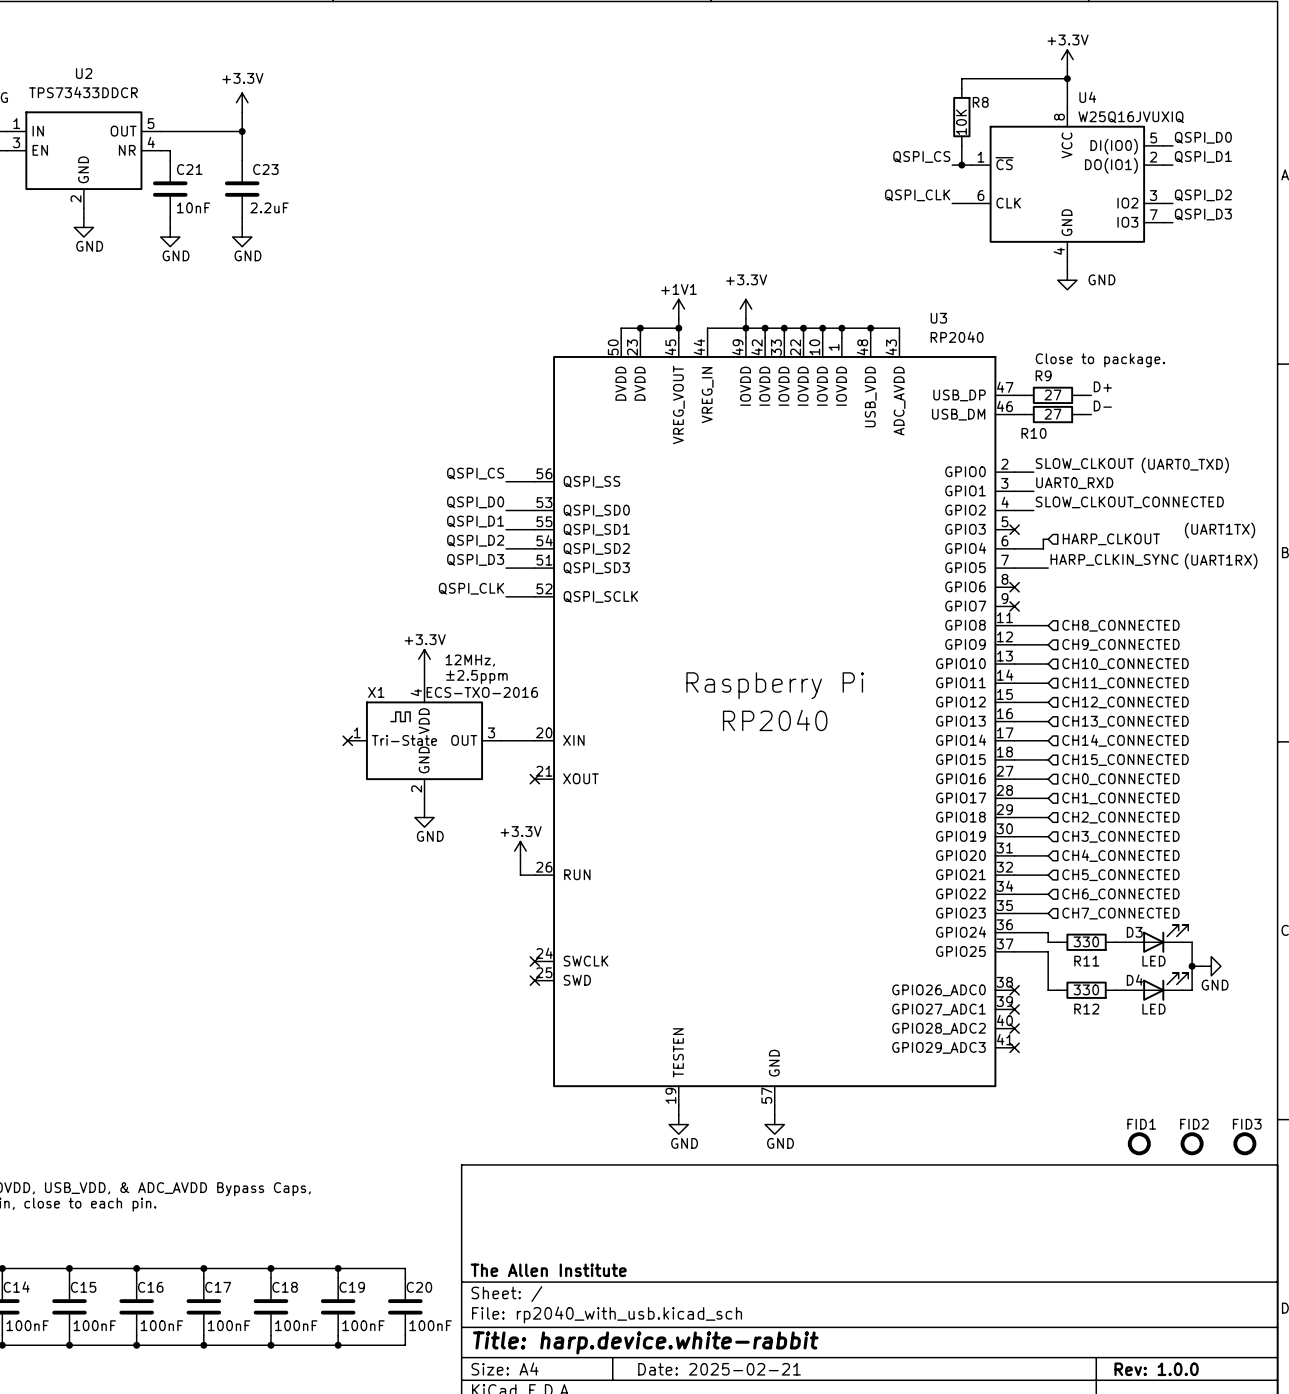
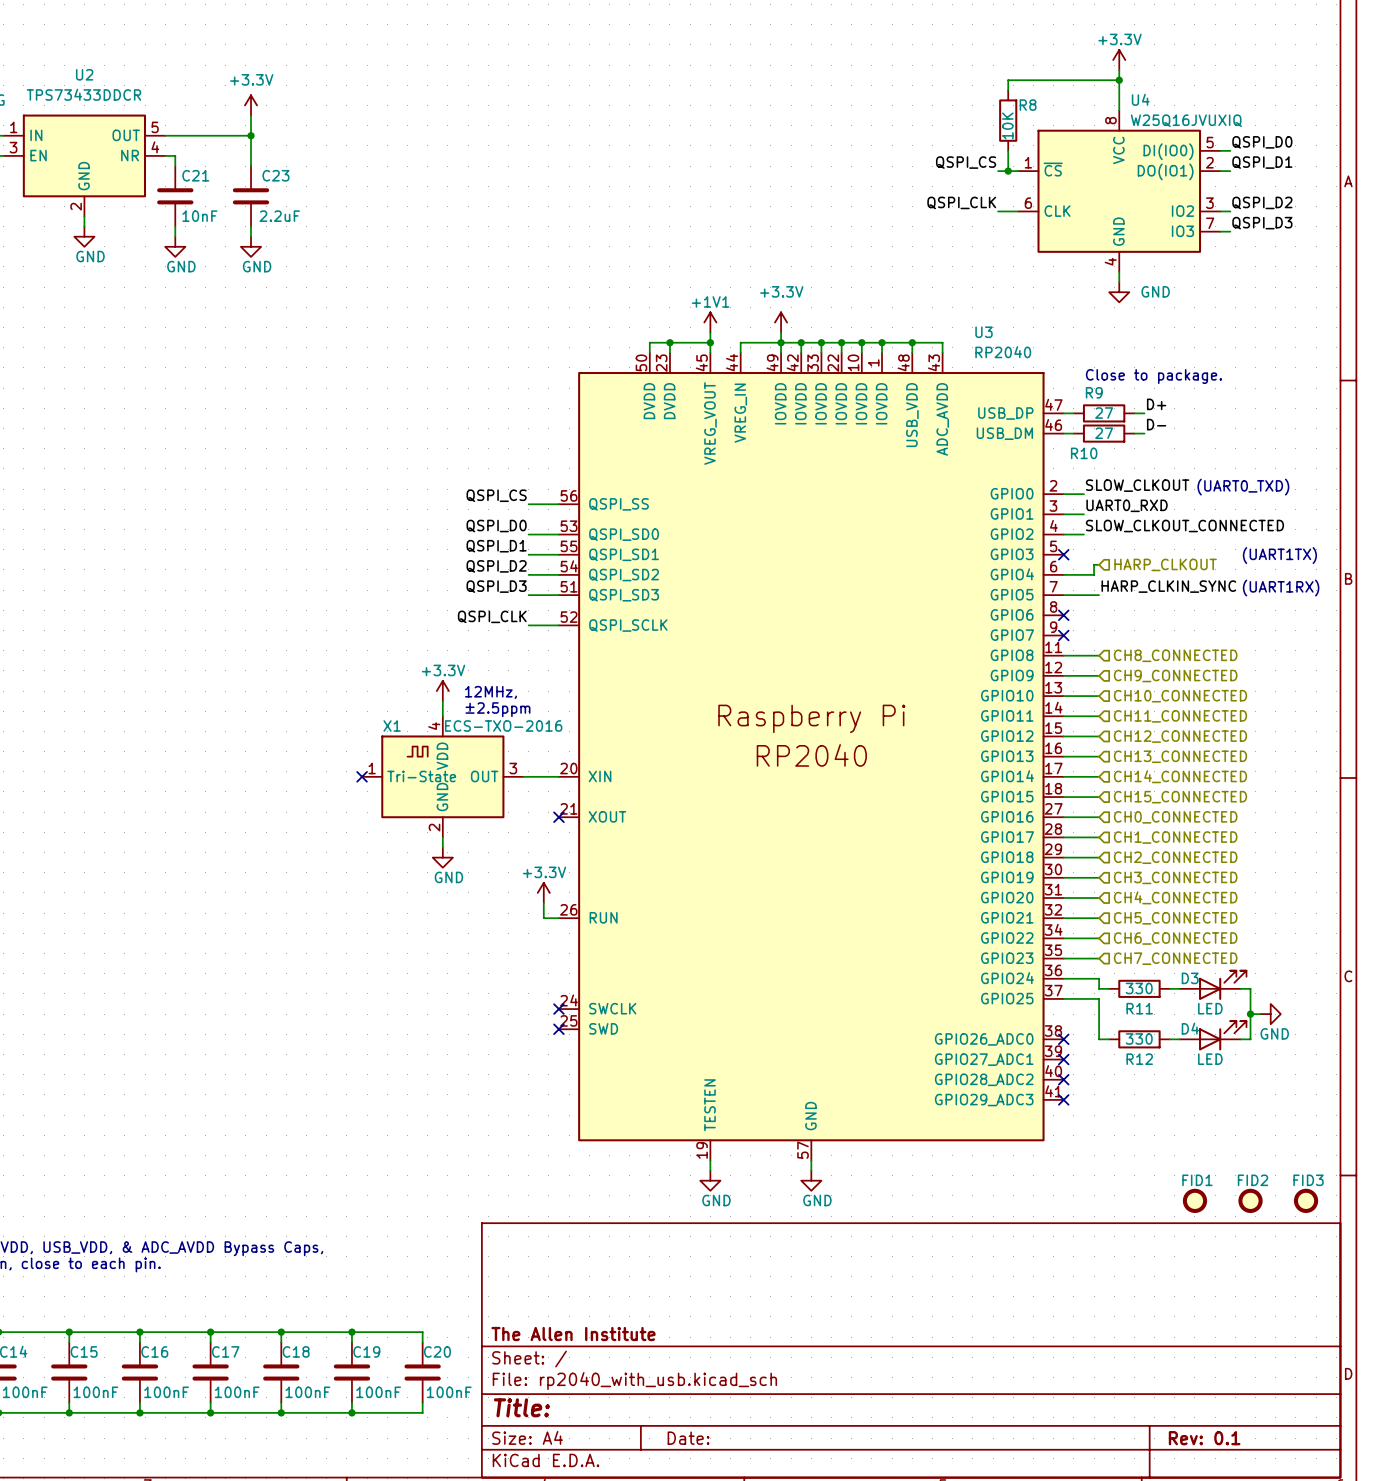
title block: Title: harp.device.white-rabbit (645, 1342) -> Title: (521, 1407)
title block: Date: 2025-02-21 (719, 1369) -> Date: (688, 1438)
title block: Rev: 1.0.0 (1156, 1369) -> Rev: 0.1 (1204, 1438)

